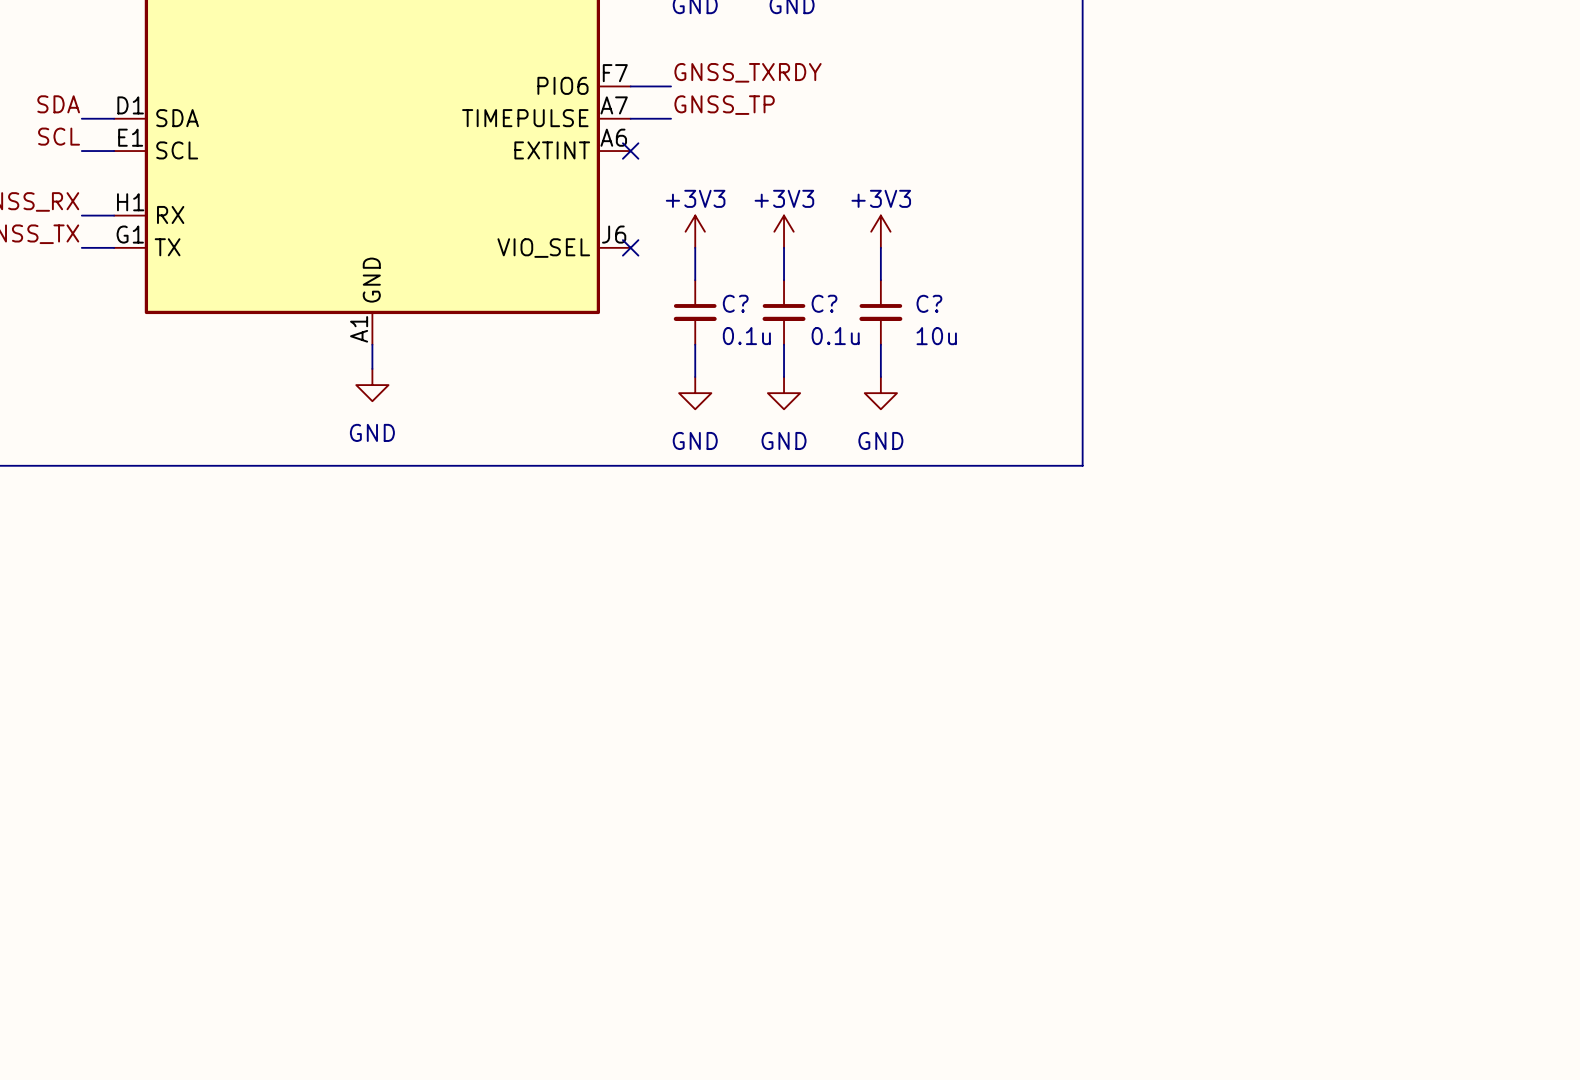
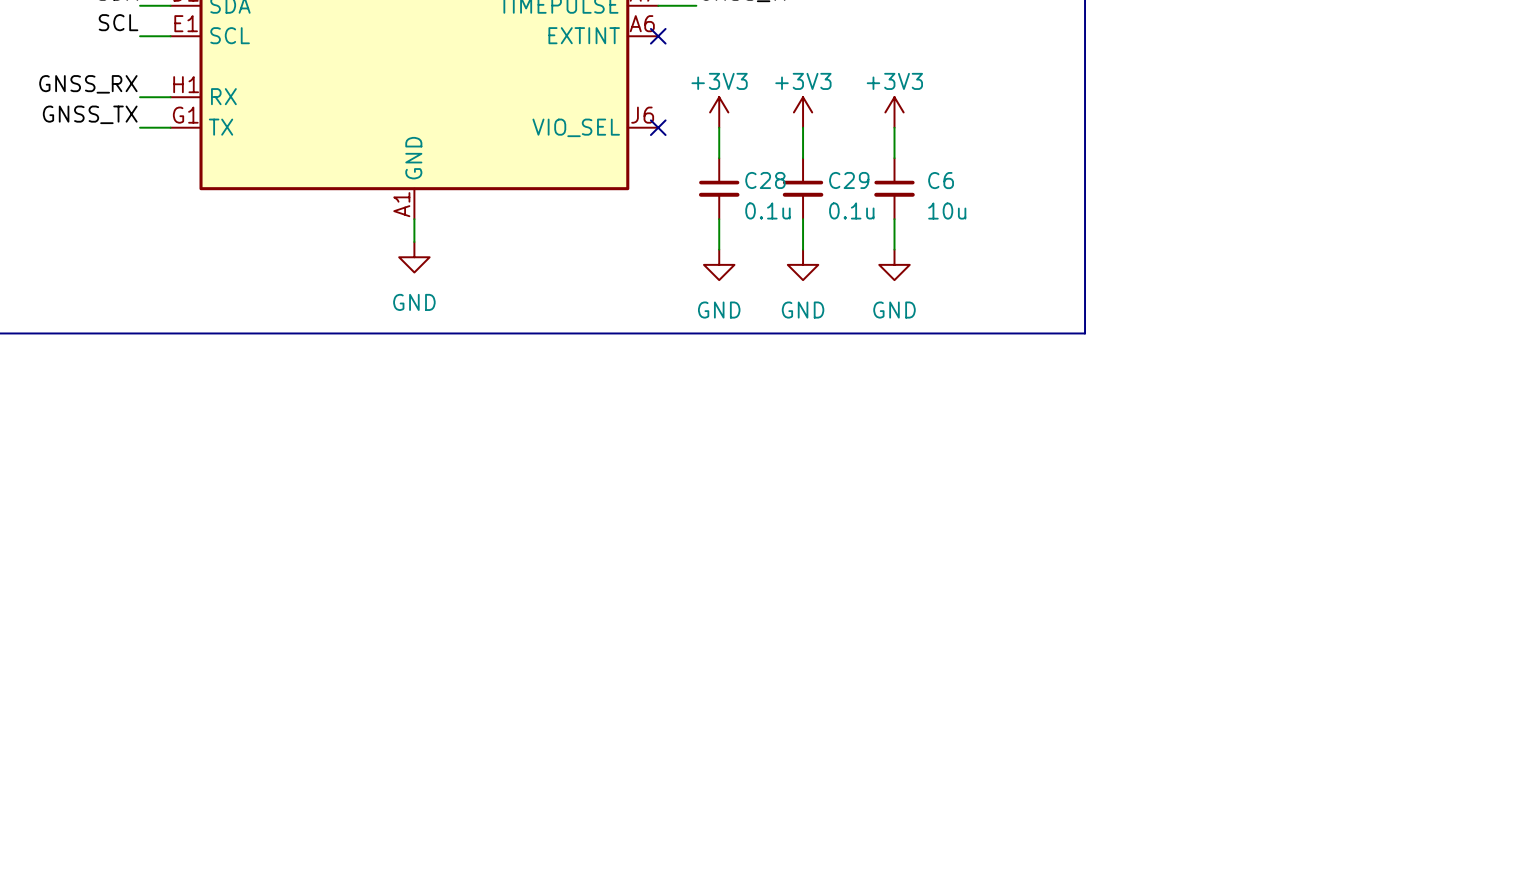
C? name: C? (735, 303) -> C28 (765, 180)
C? name: C? (824, 303) -> C29 (849, 180)
C? name: C? (929, 303) -> C6 (941, 180)

